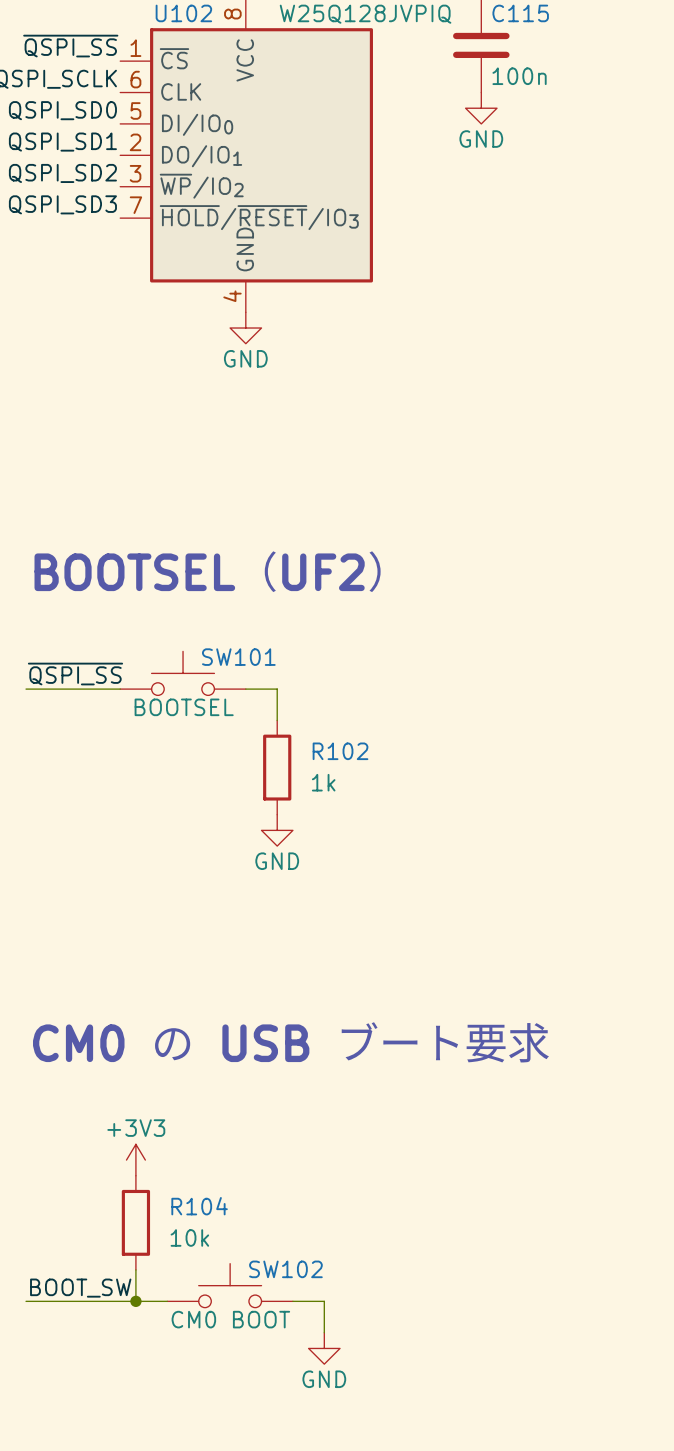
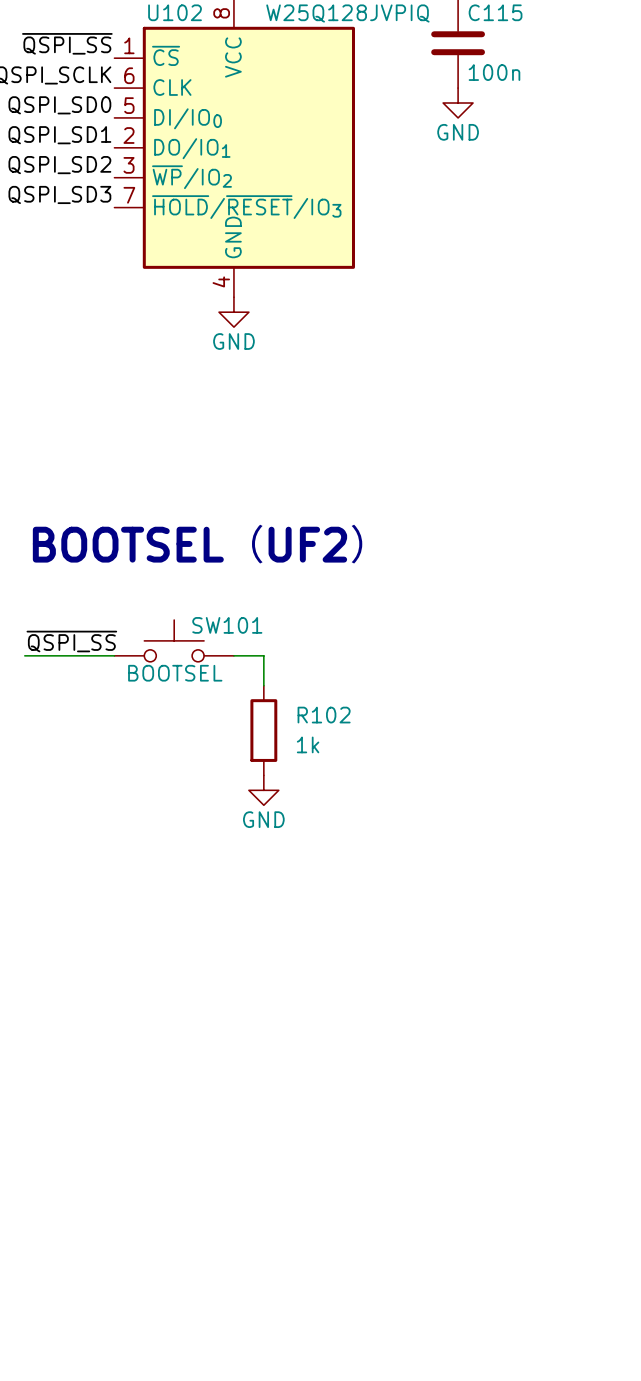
text: CM0 の USB ブート要求 (292, 1042) -> none
power symbol: +3V3 (135, 1160) -> none
R104: 10k (135, 1222) -> none
wire: (135, 1269) (135, 1301) -> none
SW102: CM0 BOOT (230, 1285) -> none
label: BOOT_SW (80, 1288) -> none
wire: (26, 1301) (167, 1301) -> none
junction: (135, 1301) -> none
wire: (292, 1301) (324, 1301) (324, 1332) -> none
power symbol: GND (324, 1348) -> none

